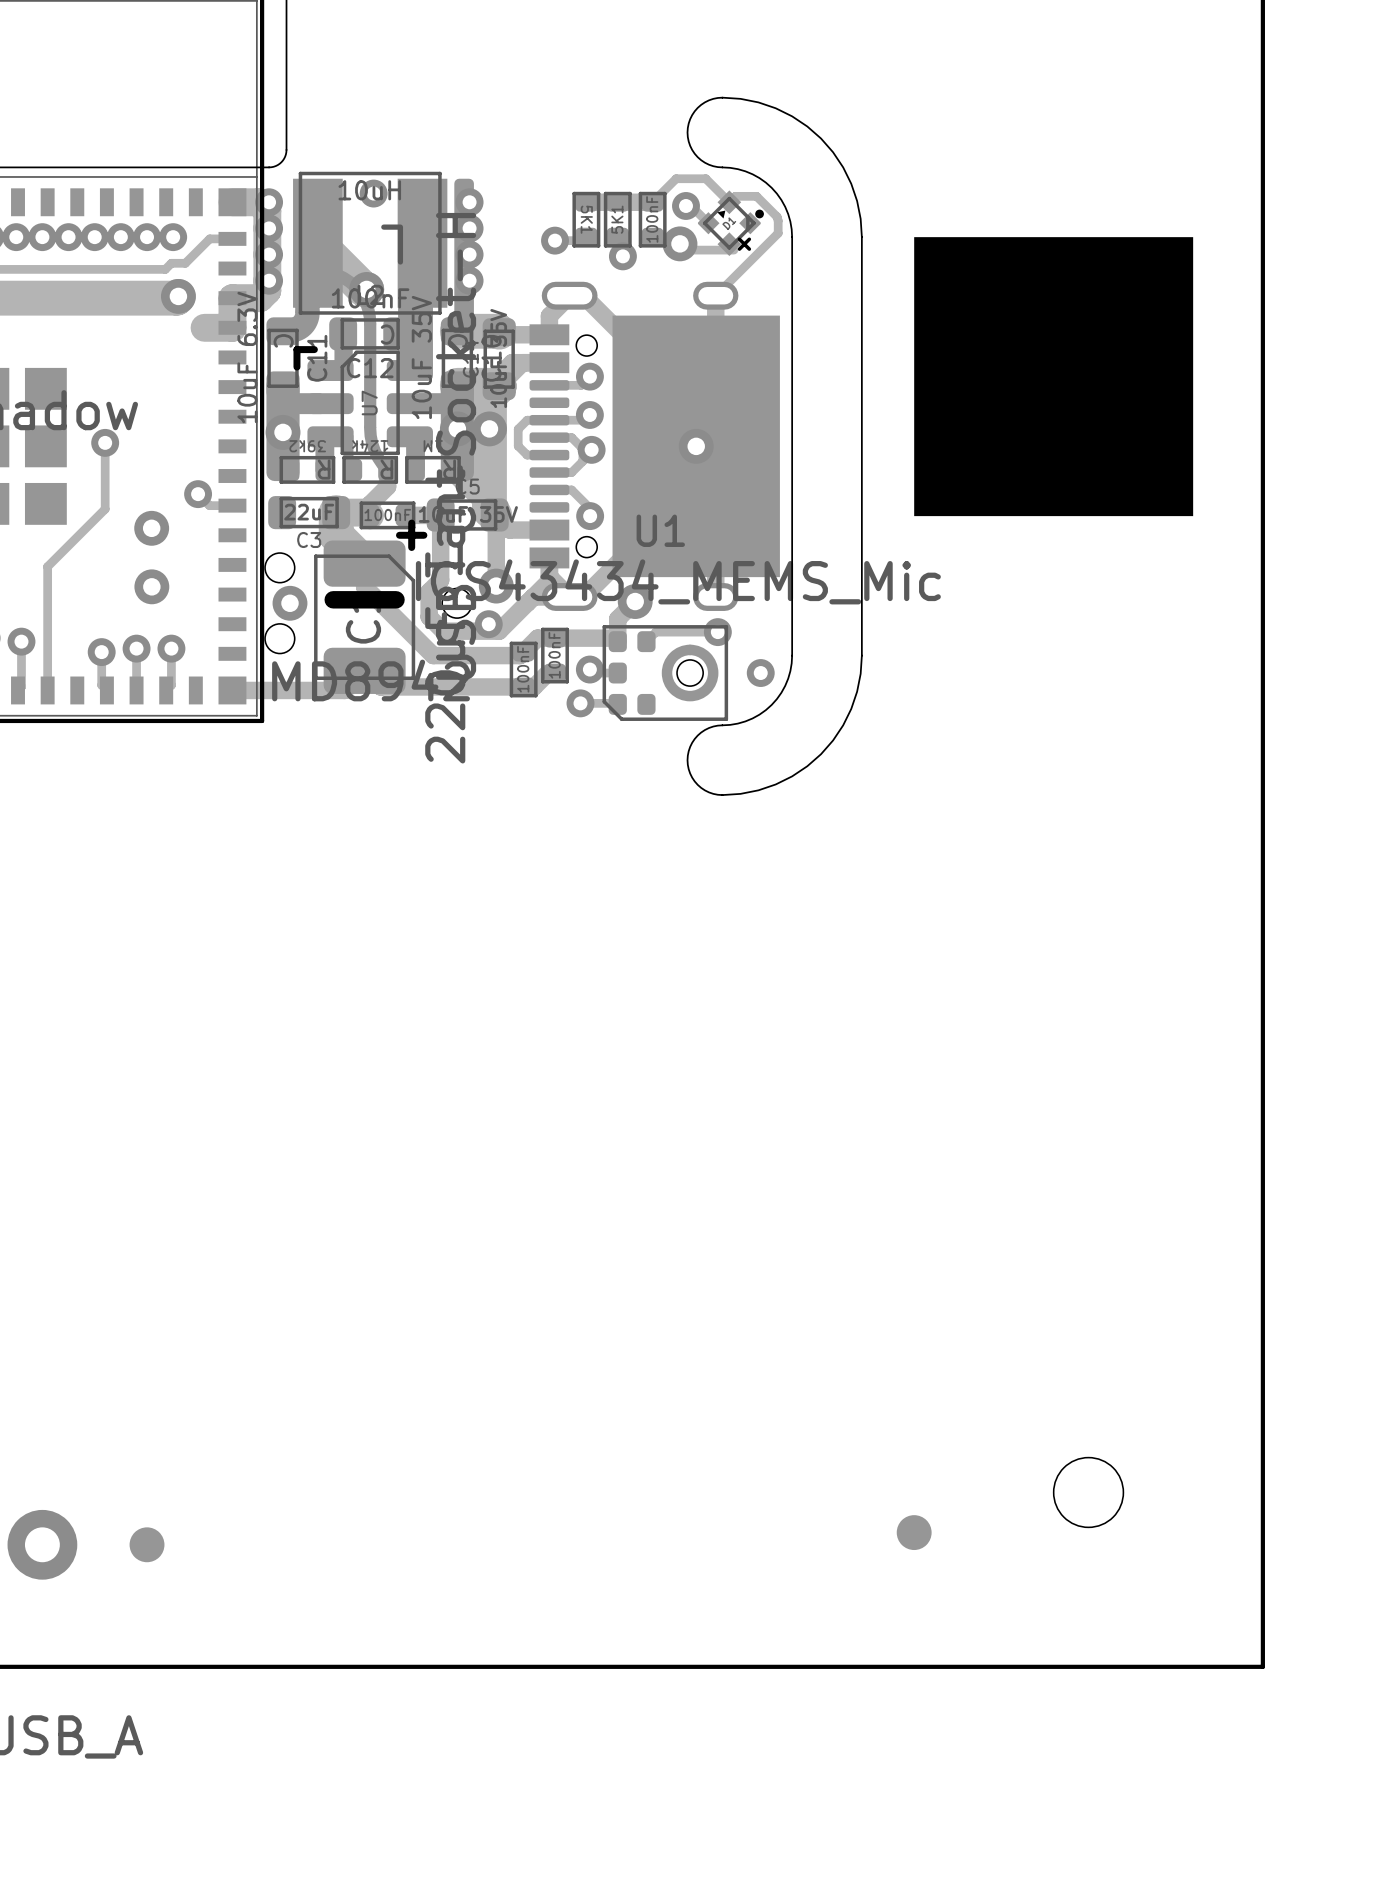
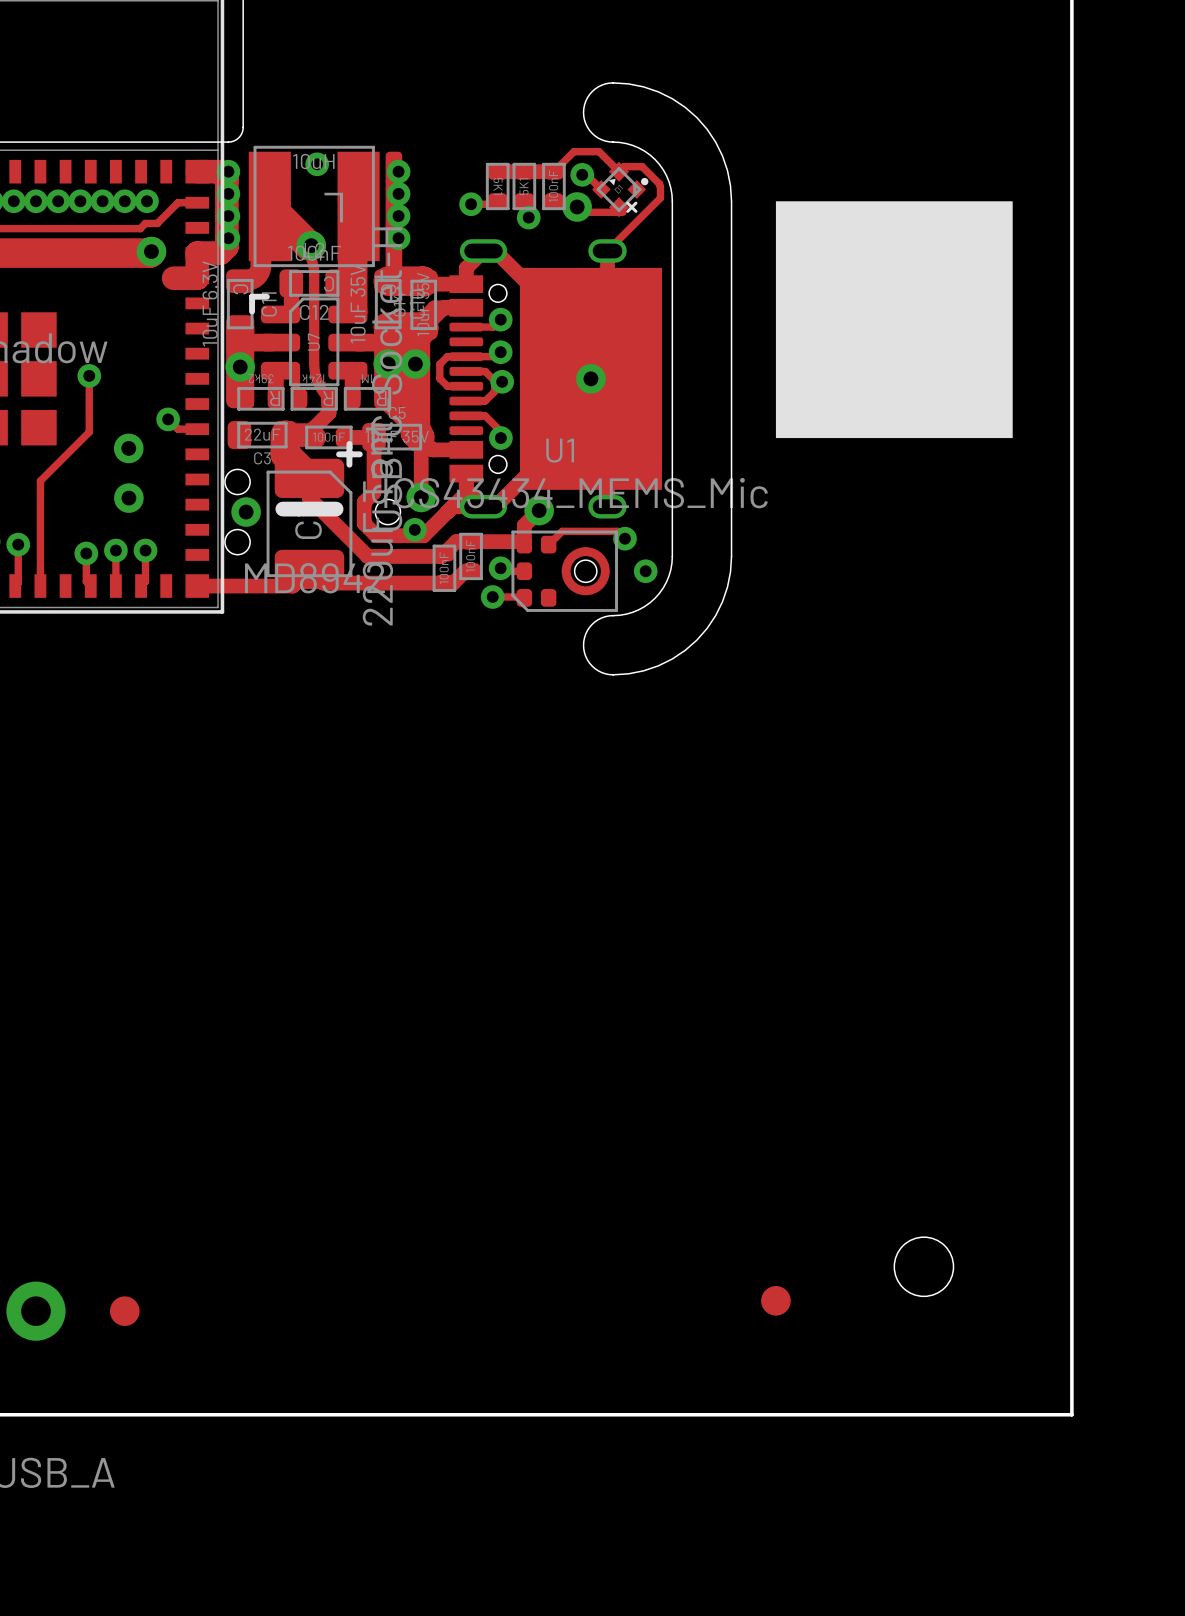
track: (717, 632) (655, 632) (646, 641) -> none
via position: (717, 632) -> (624, 538)
track: none -> (554, 538) (562, 531) (617, 531) (624, 538)

